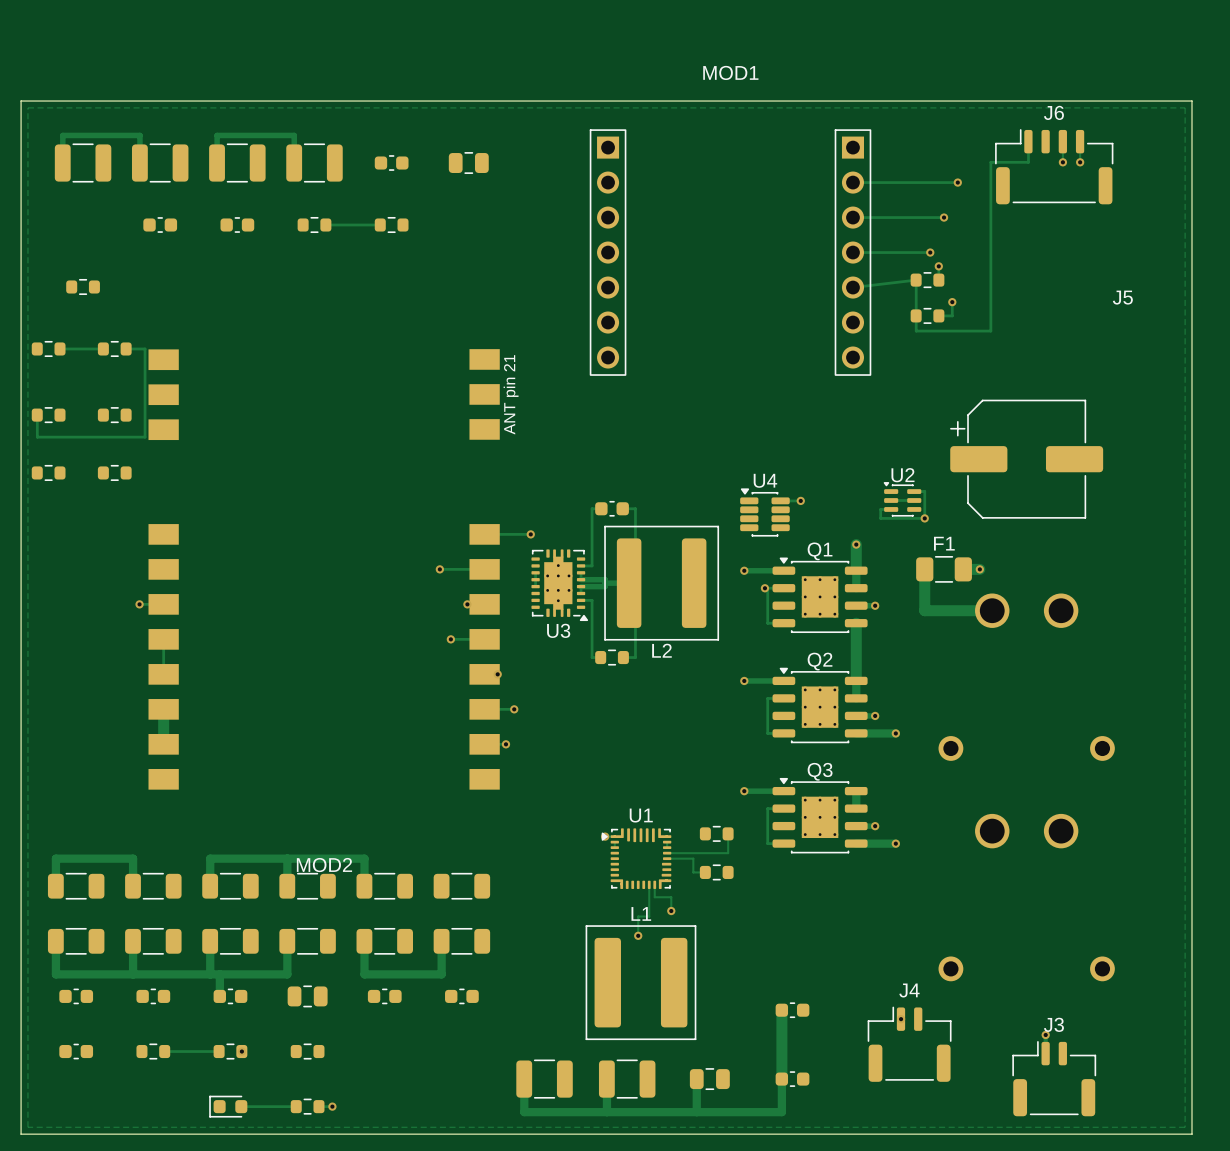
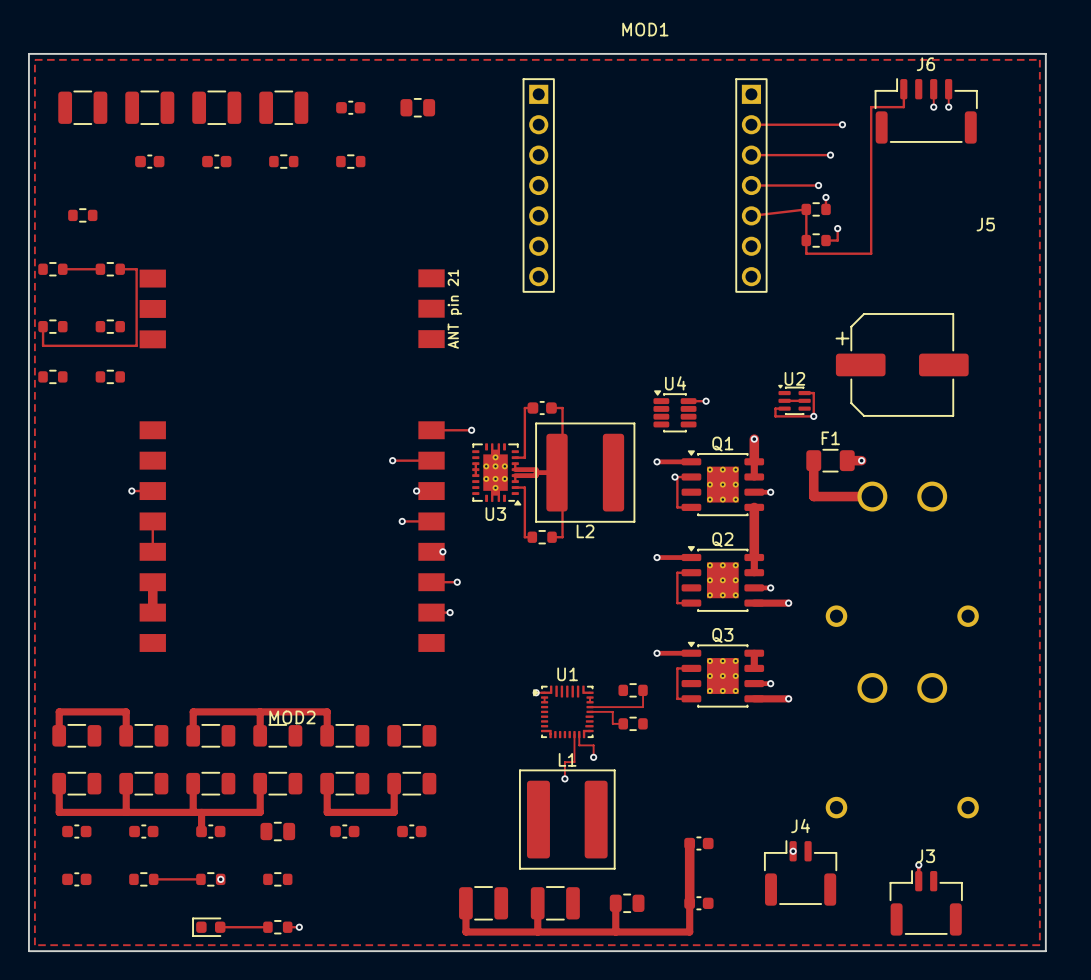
track: (62, 163) (62, 135) (139, 135) (139, 163) -> none
track: (217, 163) (217, 135) (294, 135) (294, 163) -> none
track: (325, 225) (380, 225) -> none

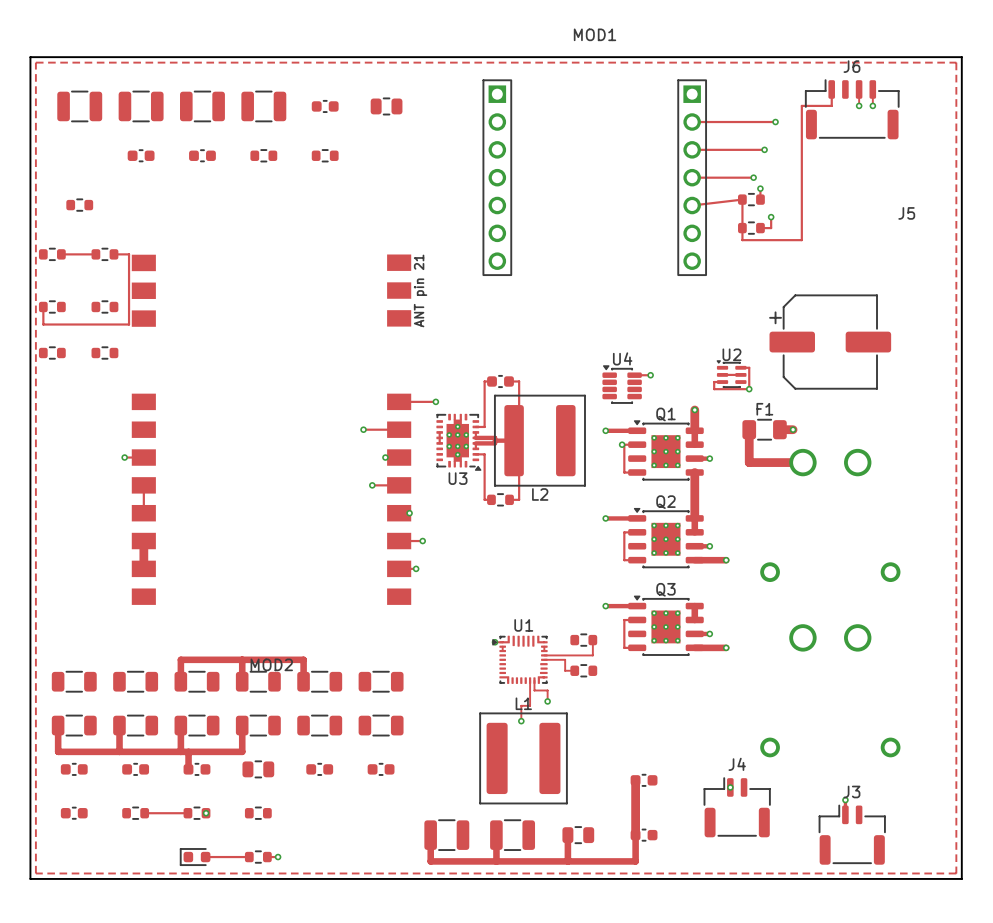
track: (59, 735) (59, 711) (126, 711) (126, 735) -> none
track: (327, 783) (327, 812) (394, 812) (394, 783) -> none

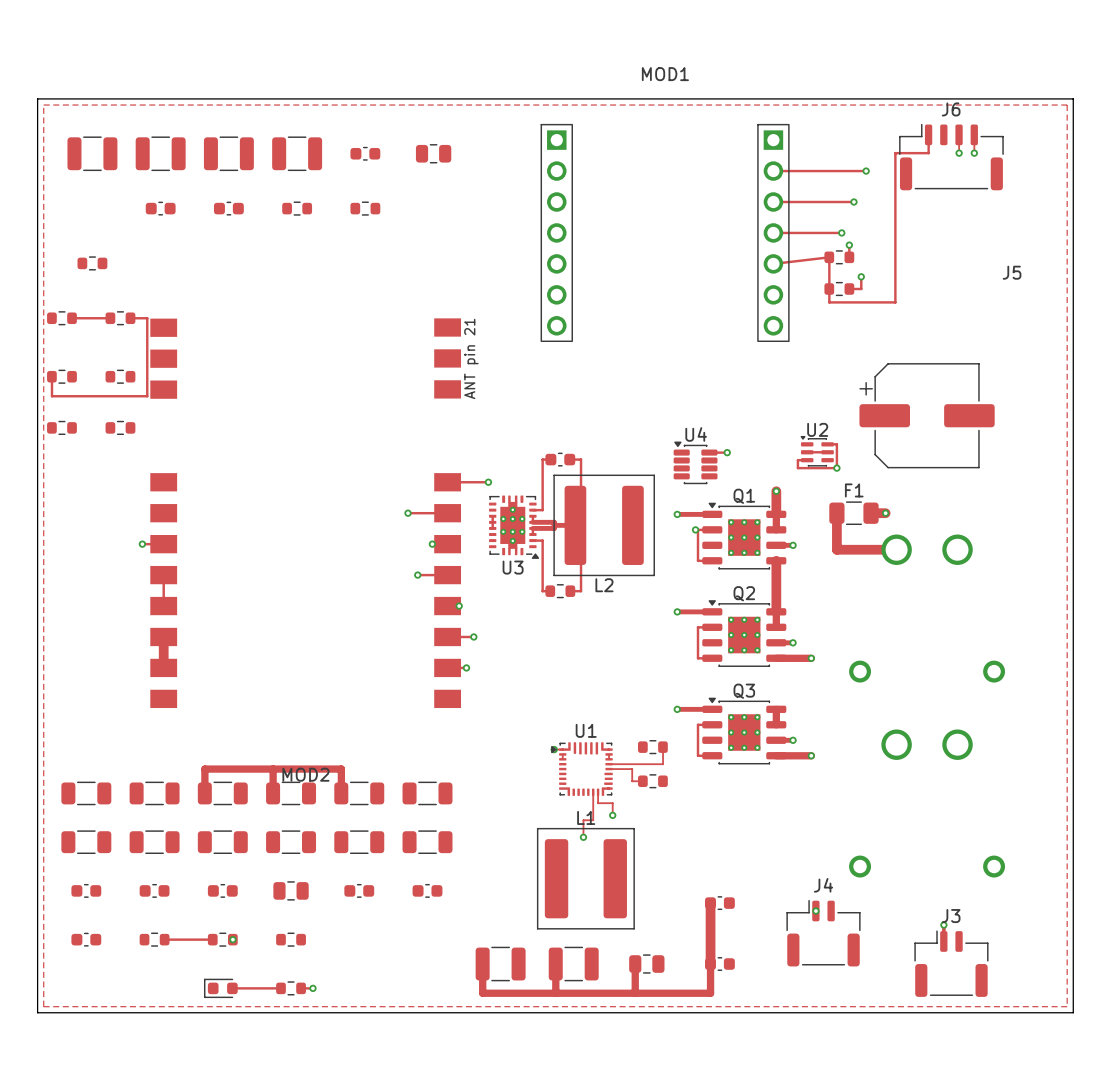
track: (58, 725) (58, 751) (242, 751) (242, 725) -> none
track: (119, 725) (119, 751) -> none
track: (180, 725) (180, 751) -> none
track: (188, 751) (188, 769) -> none

